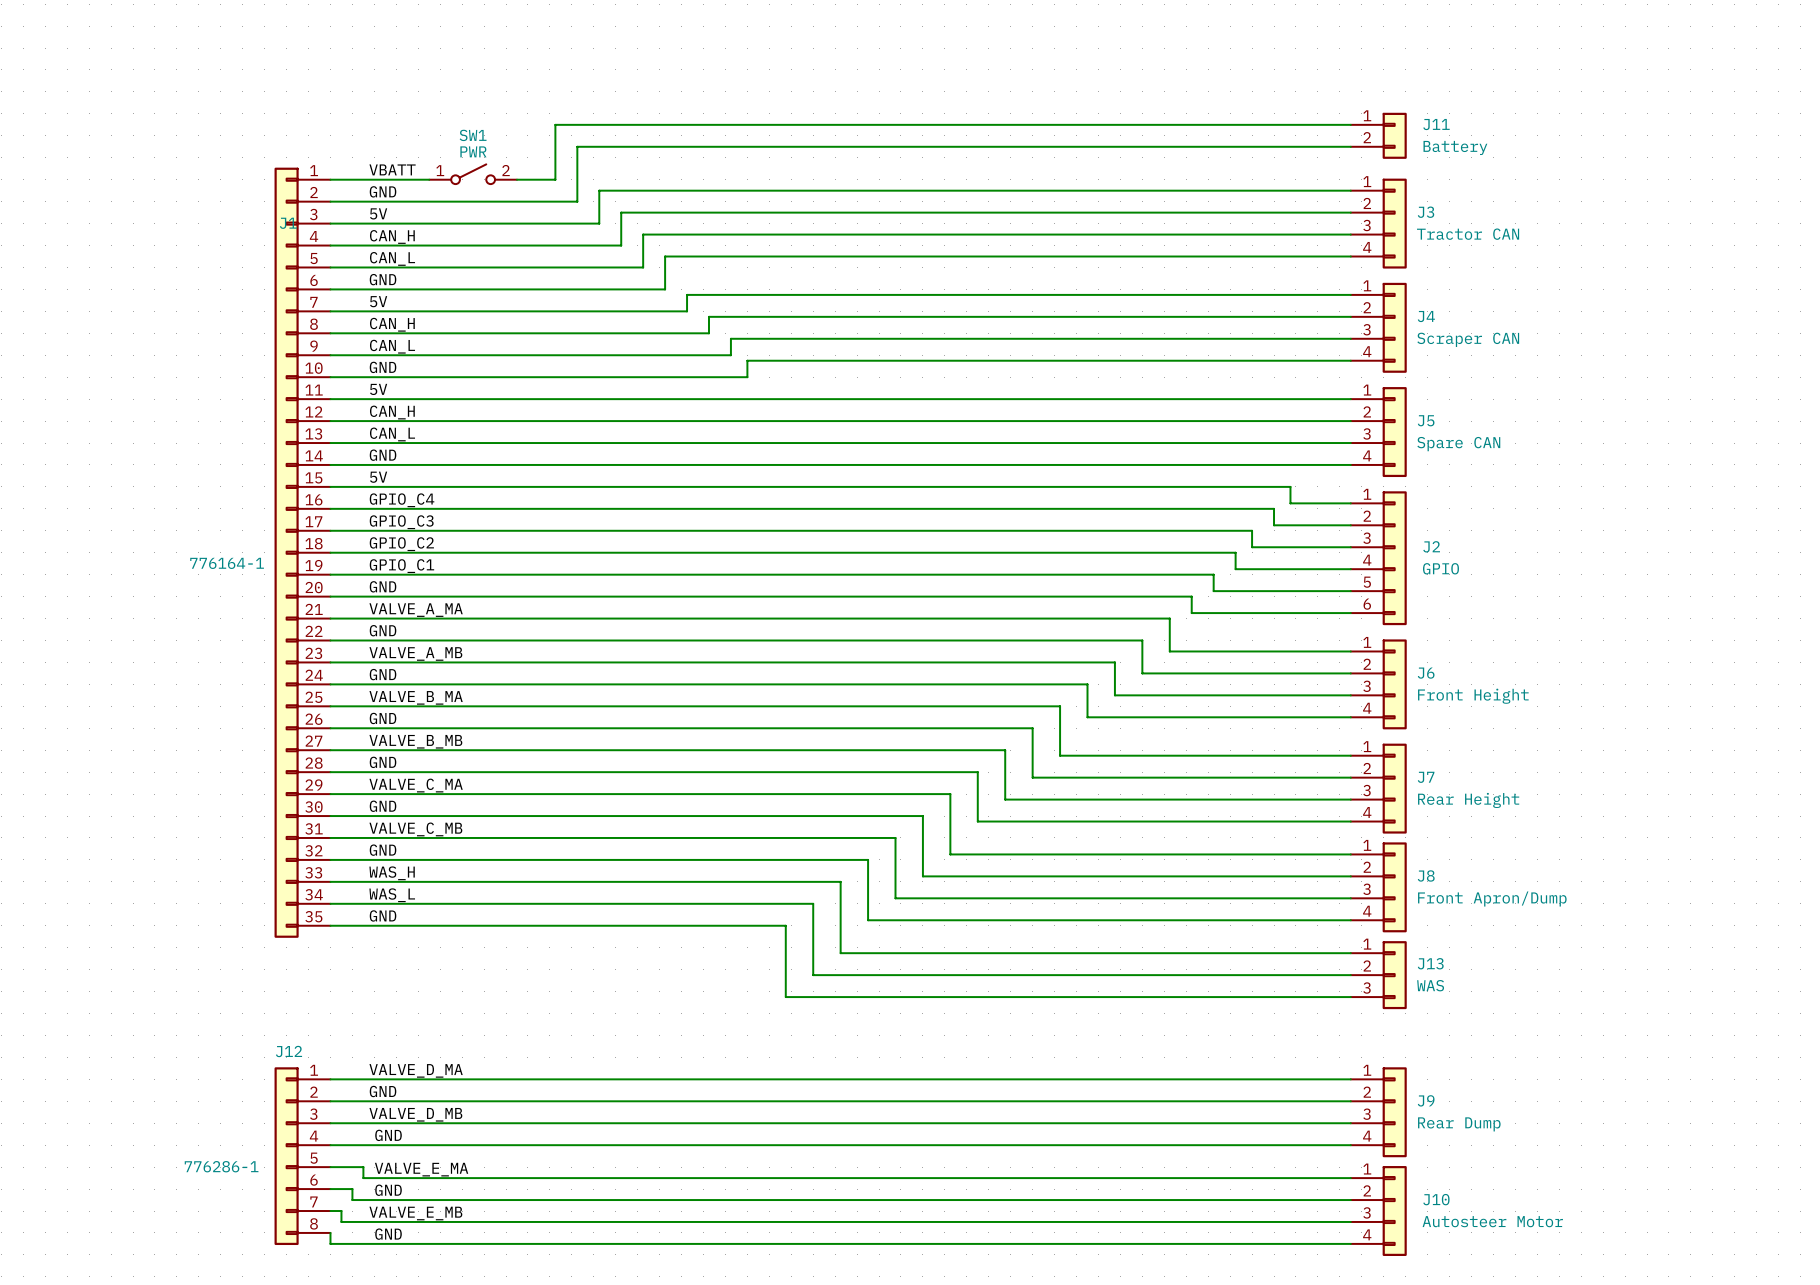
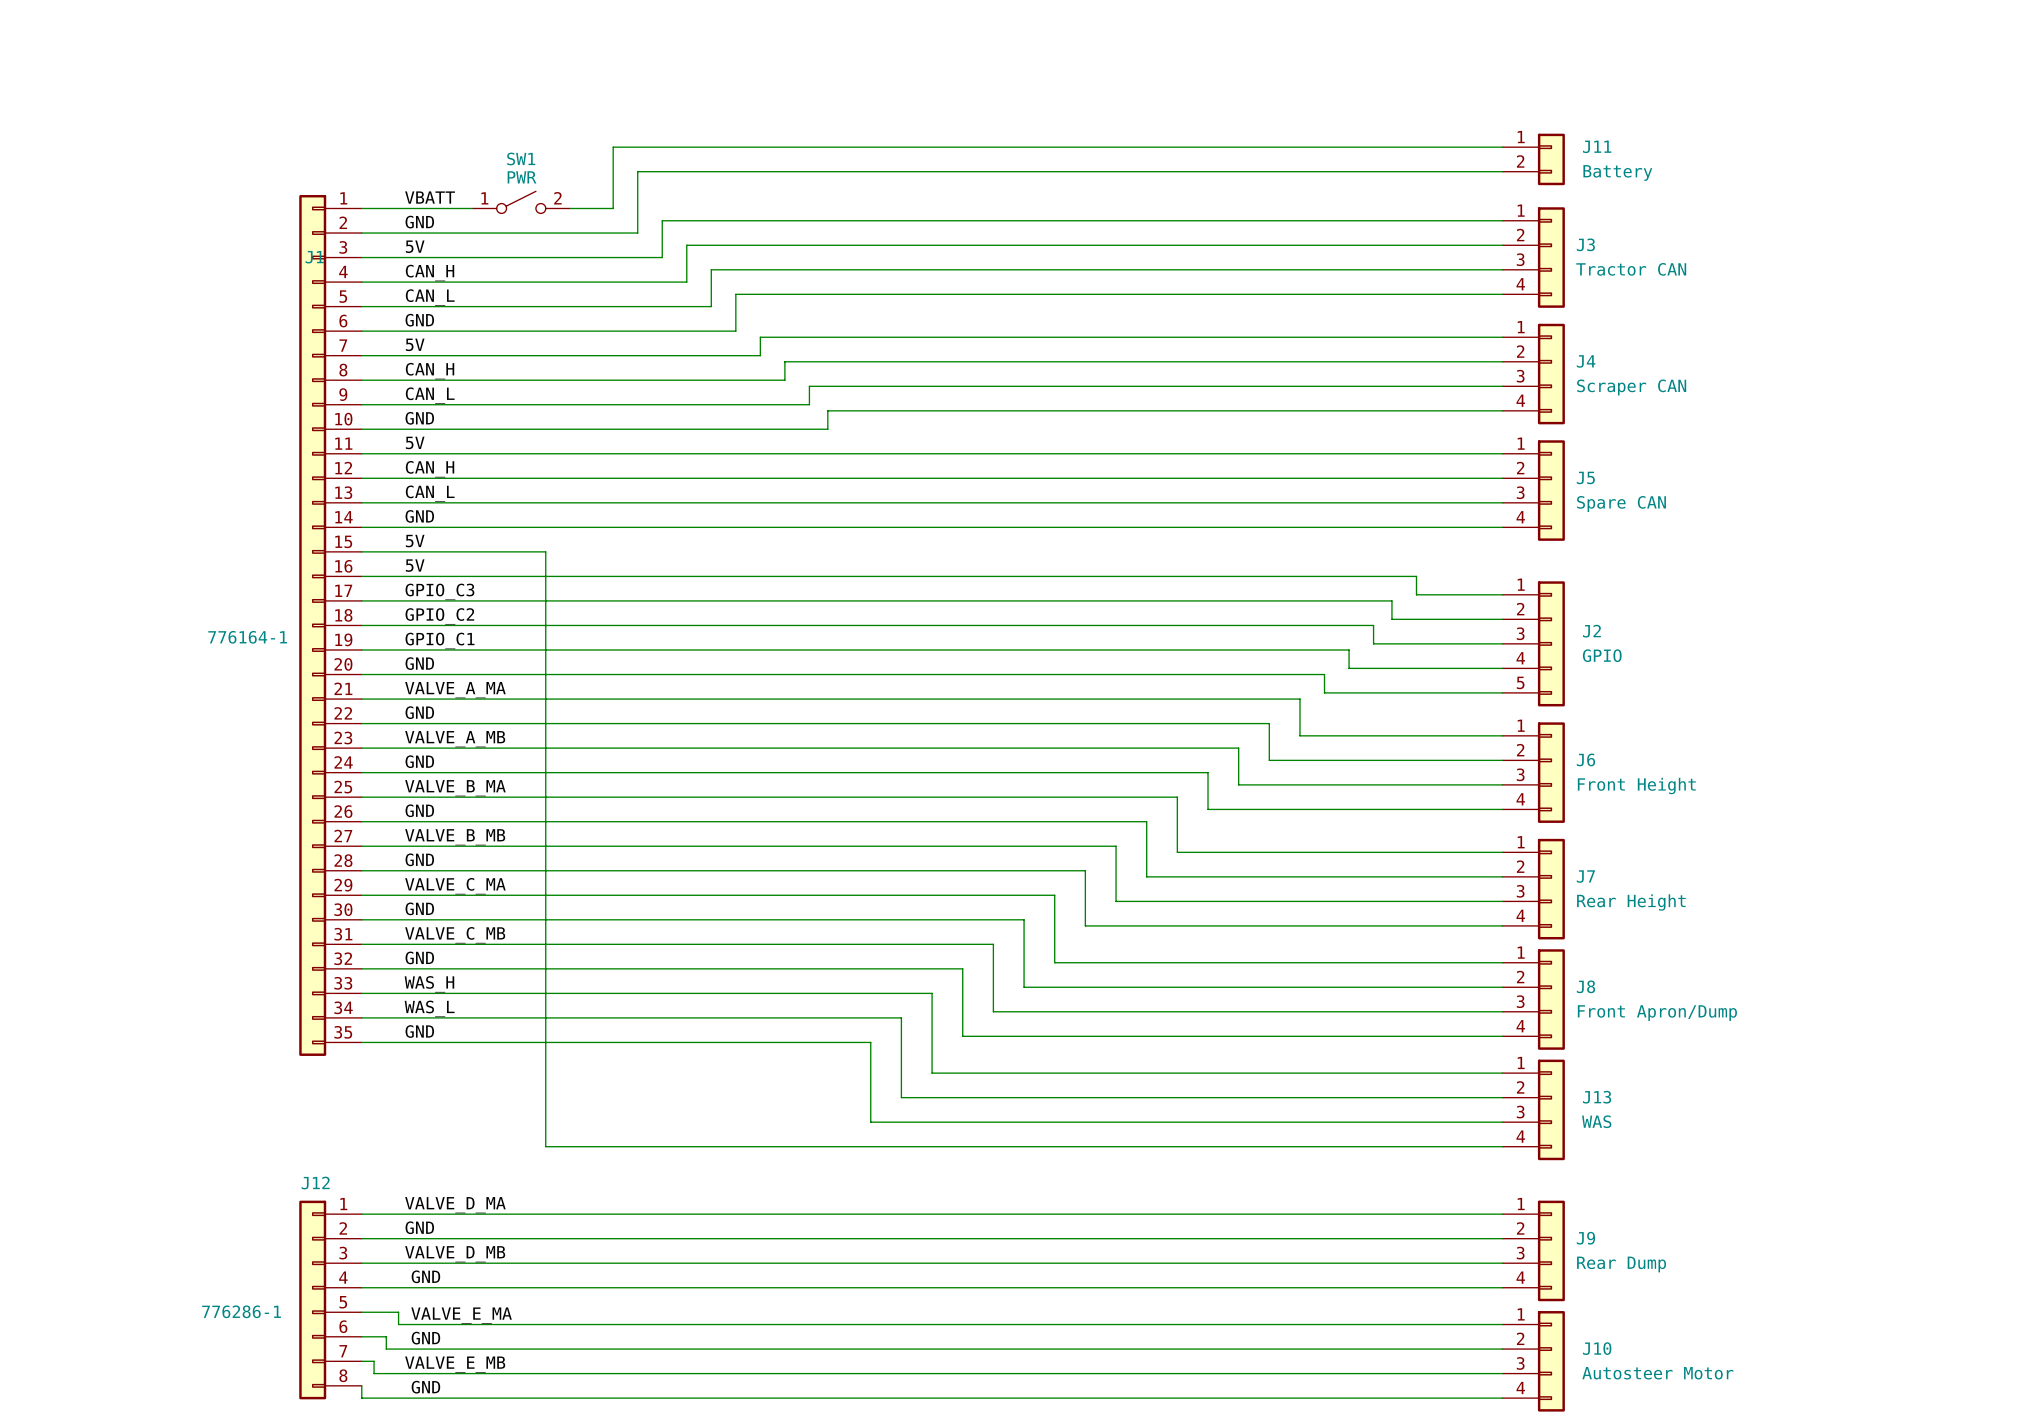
wire: (495, 486) (1290, 486) (1290, 503) (1350, 503) -> (545, 551) (545, 1146) (1502, 1146)
J2 symbol: [1350, 491, 1407, 626] -> [1502, 581, 1565, 707]
label: GPIO_C4 (402, 500) -> 5V (415, 565)
J13 symbol: [1350, 941, 1407, 1010] -> [1502, 1059, 1565, 1161]

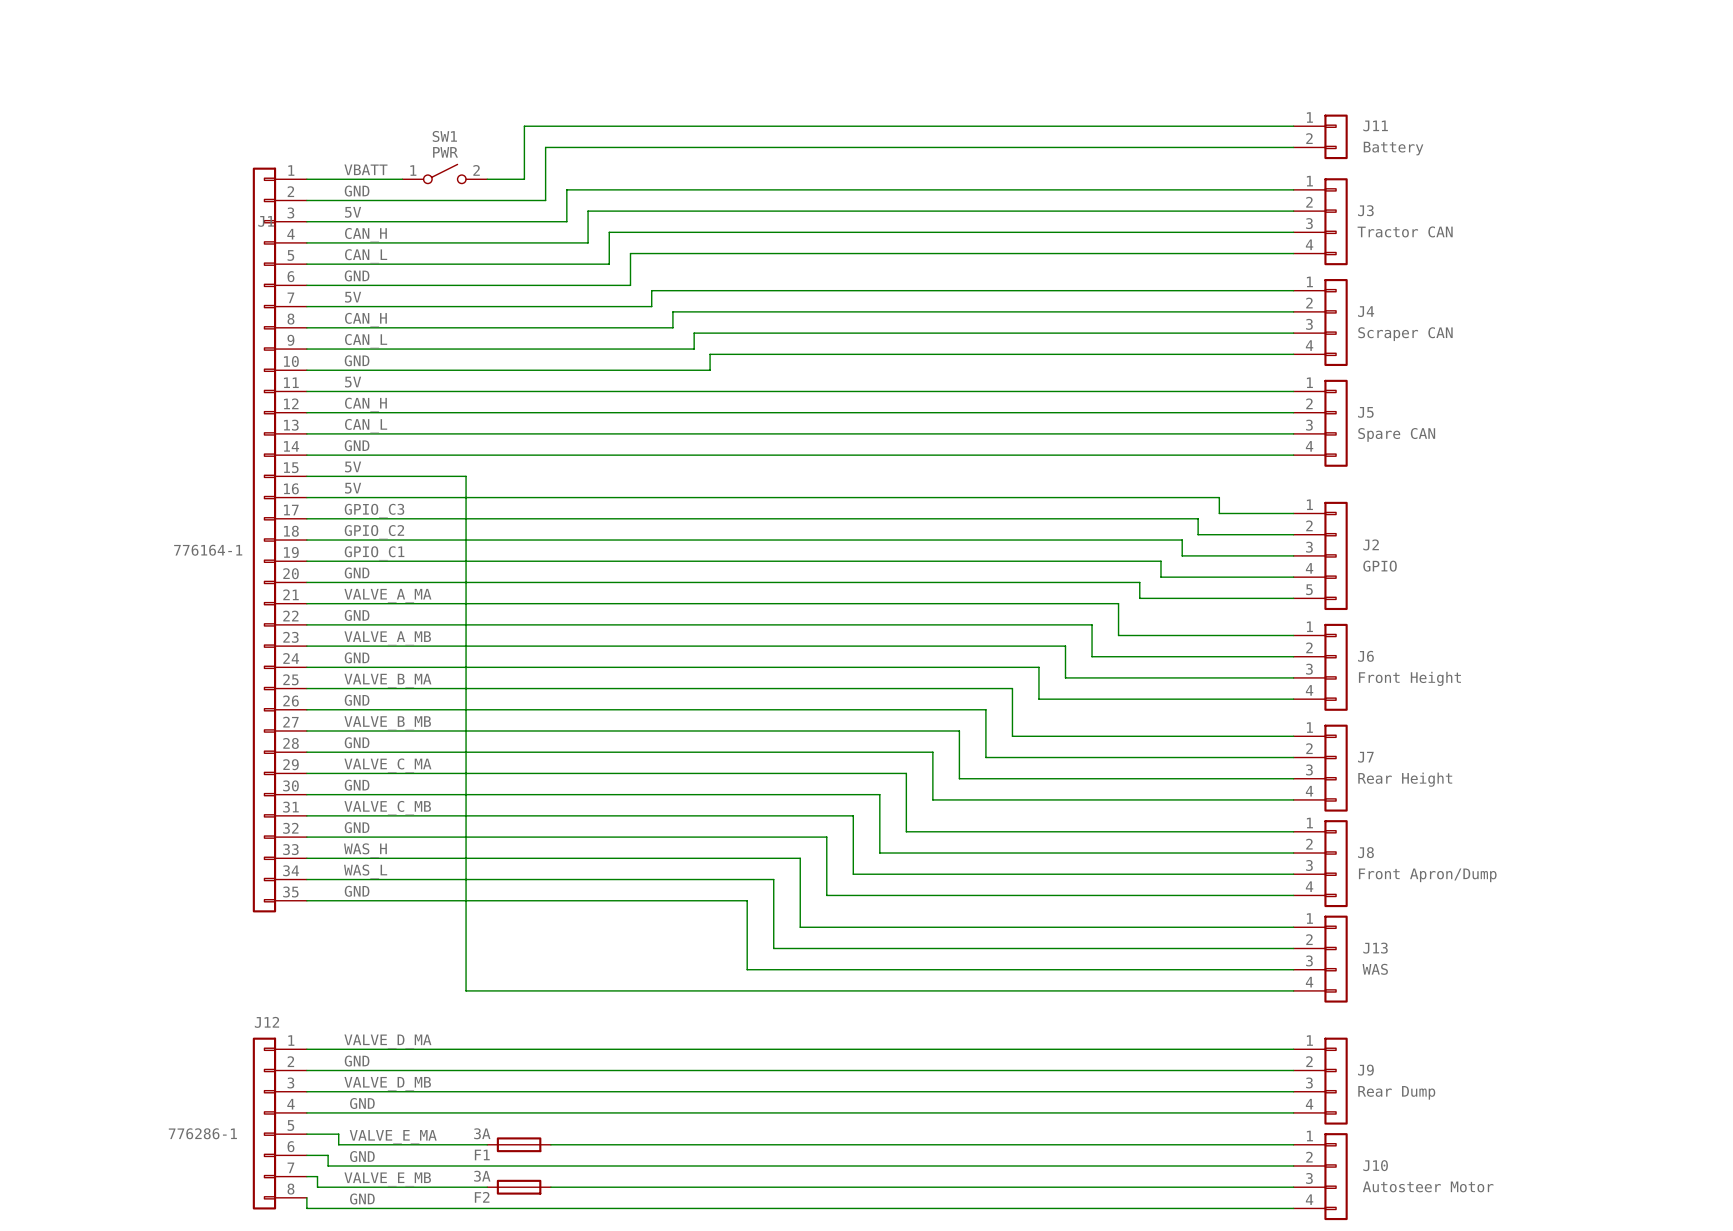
F1: none -> 3A (519, 1144)
F2: none -> 3A (519, 1187)

